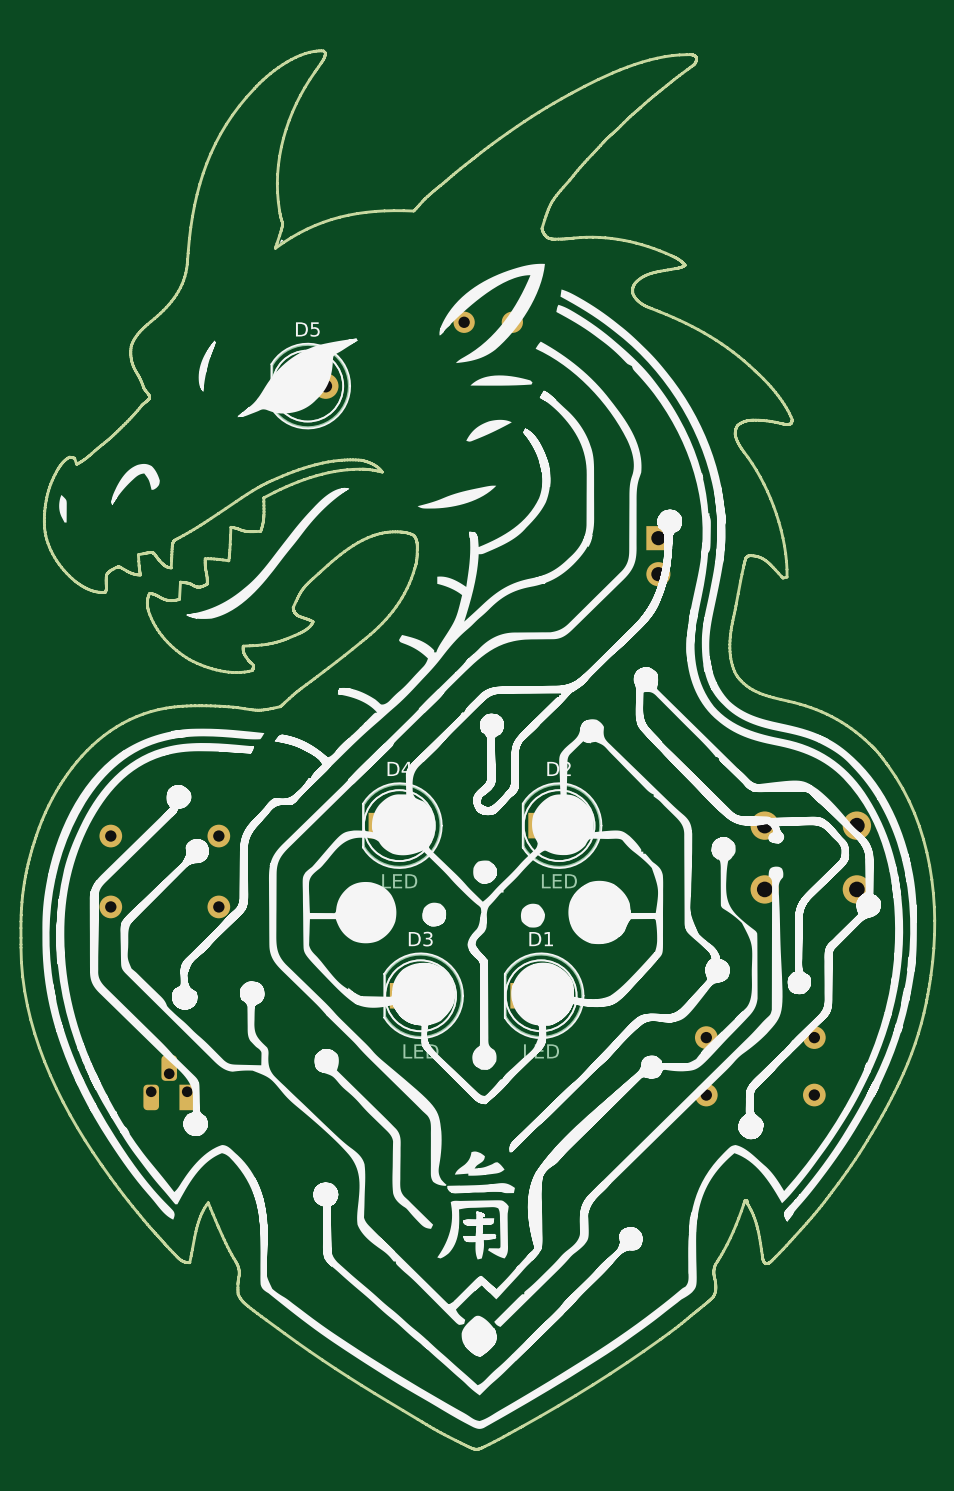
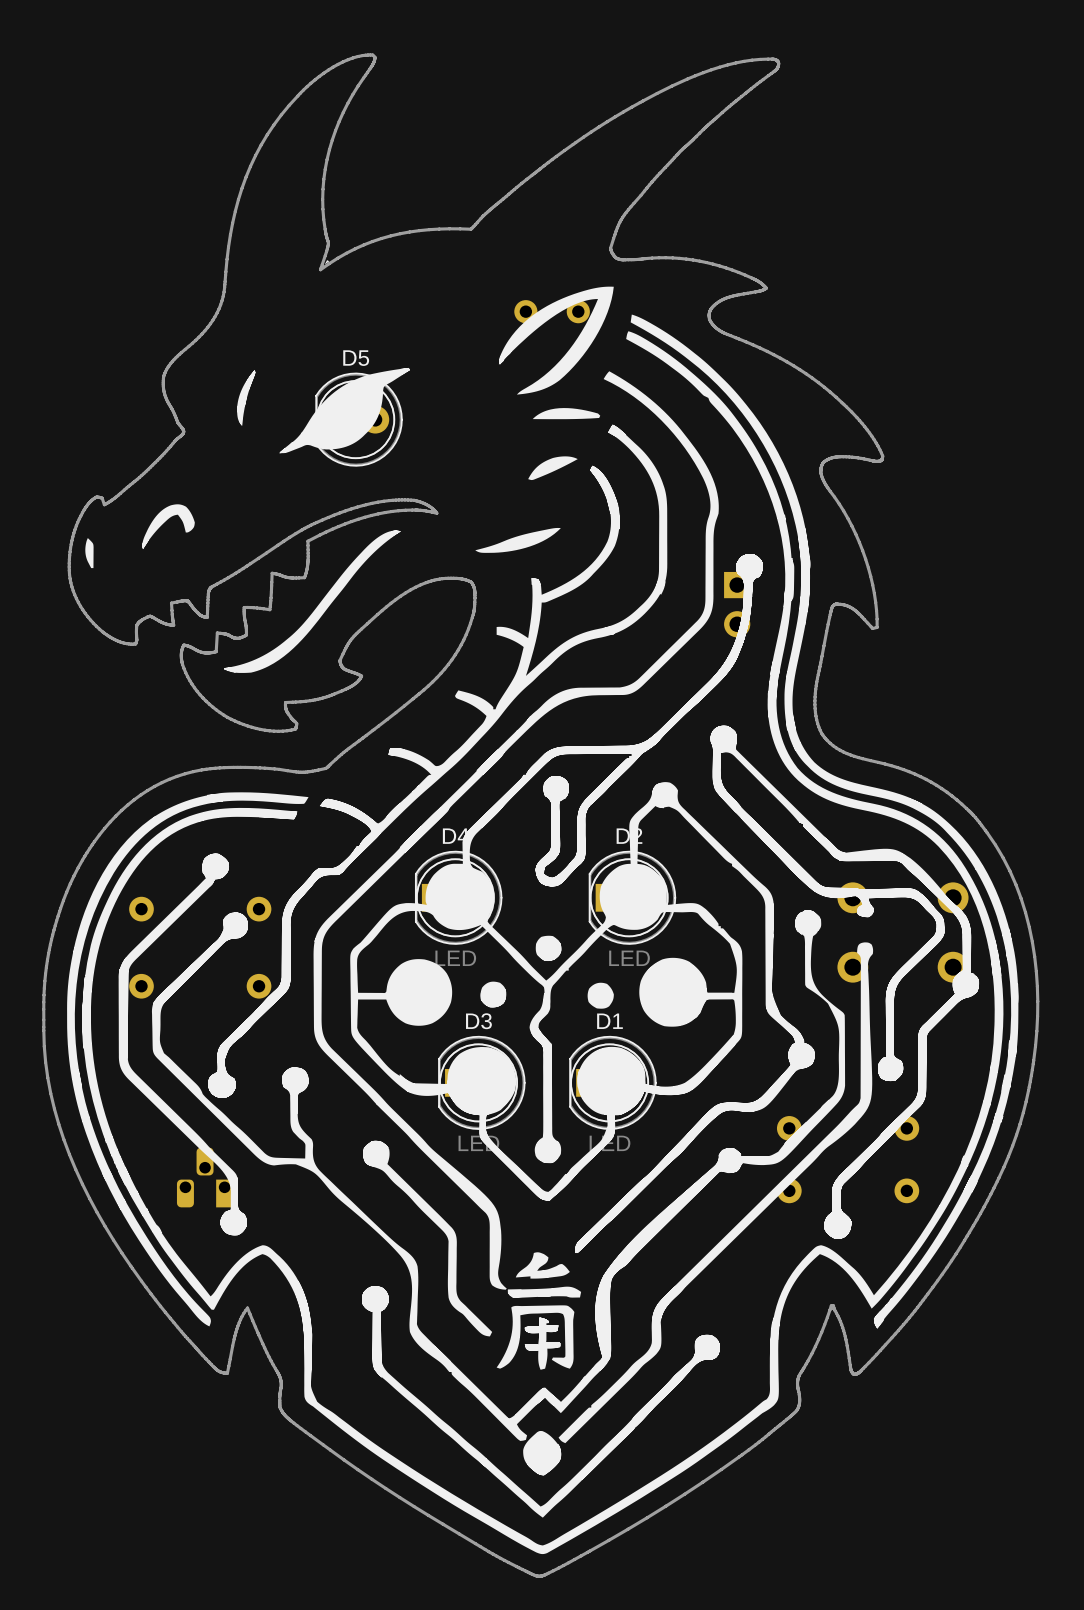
part position: (488, 322) -> (552, 311)

